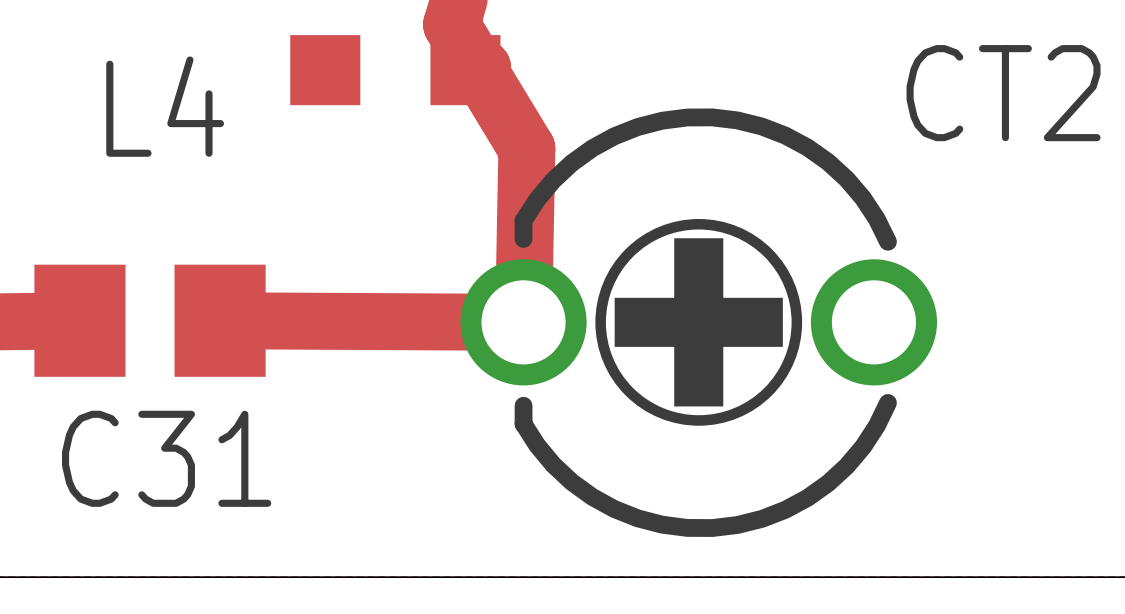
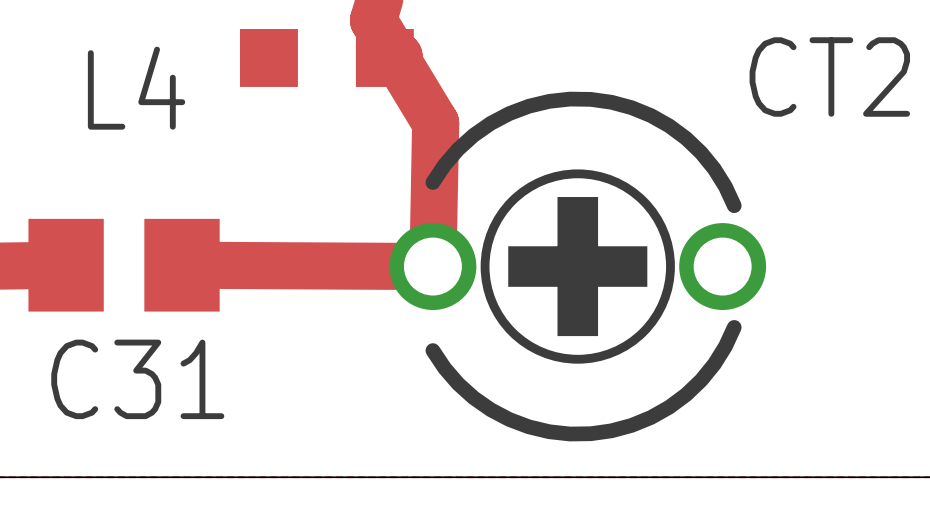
CT2 footprint: [460, 108, 938, 537] -> [389, 91, 767, 442]

